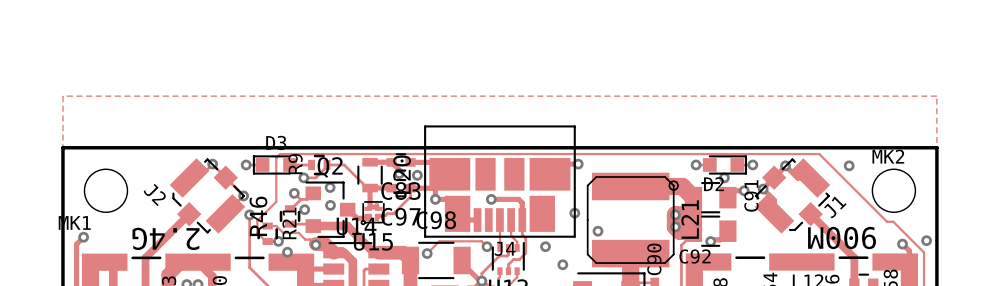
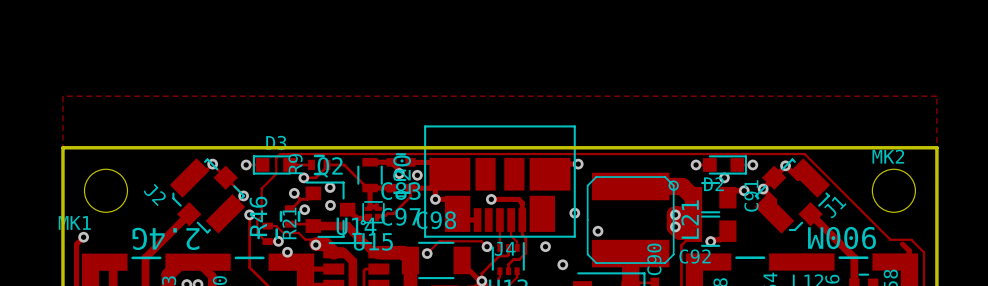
track: (804, 154) (819, 154) (887, 221) (893, 221) (911, 239) -> (804, 154) (890, 239) (911, 239)
via: (849, 165) -> none
track: (276, 173) (276, 201) (261, 216) -> (276, 173) (261, 188) (261, 216)
via: (926, 240) -> none
via: (902, 244) -> none

